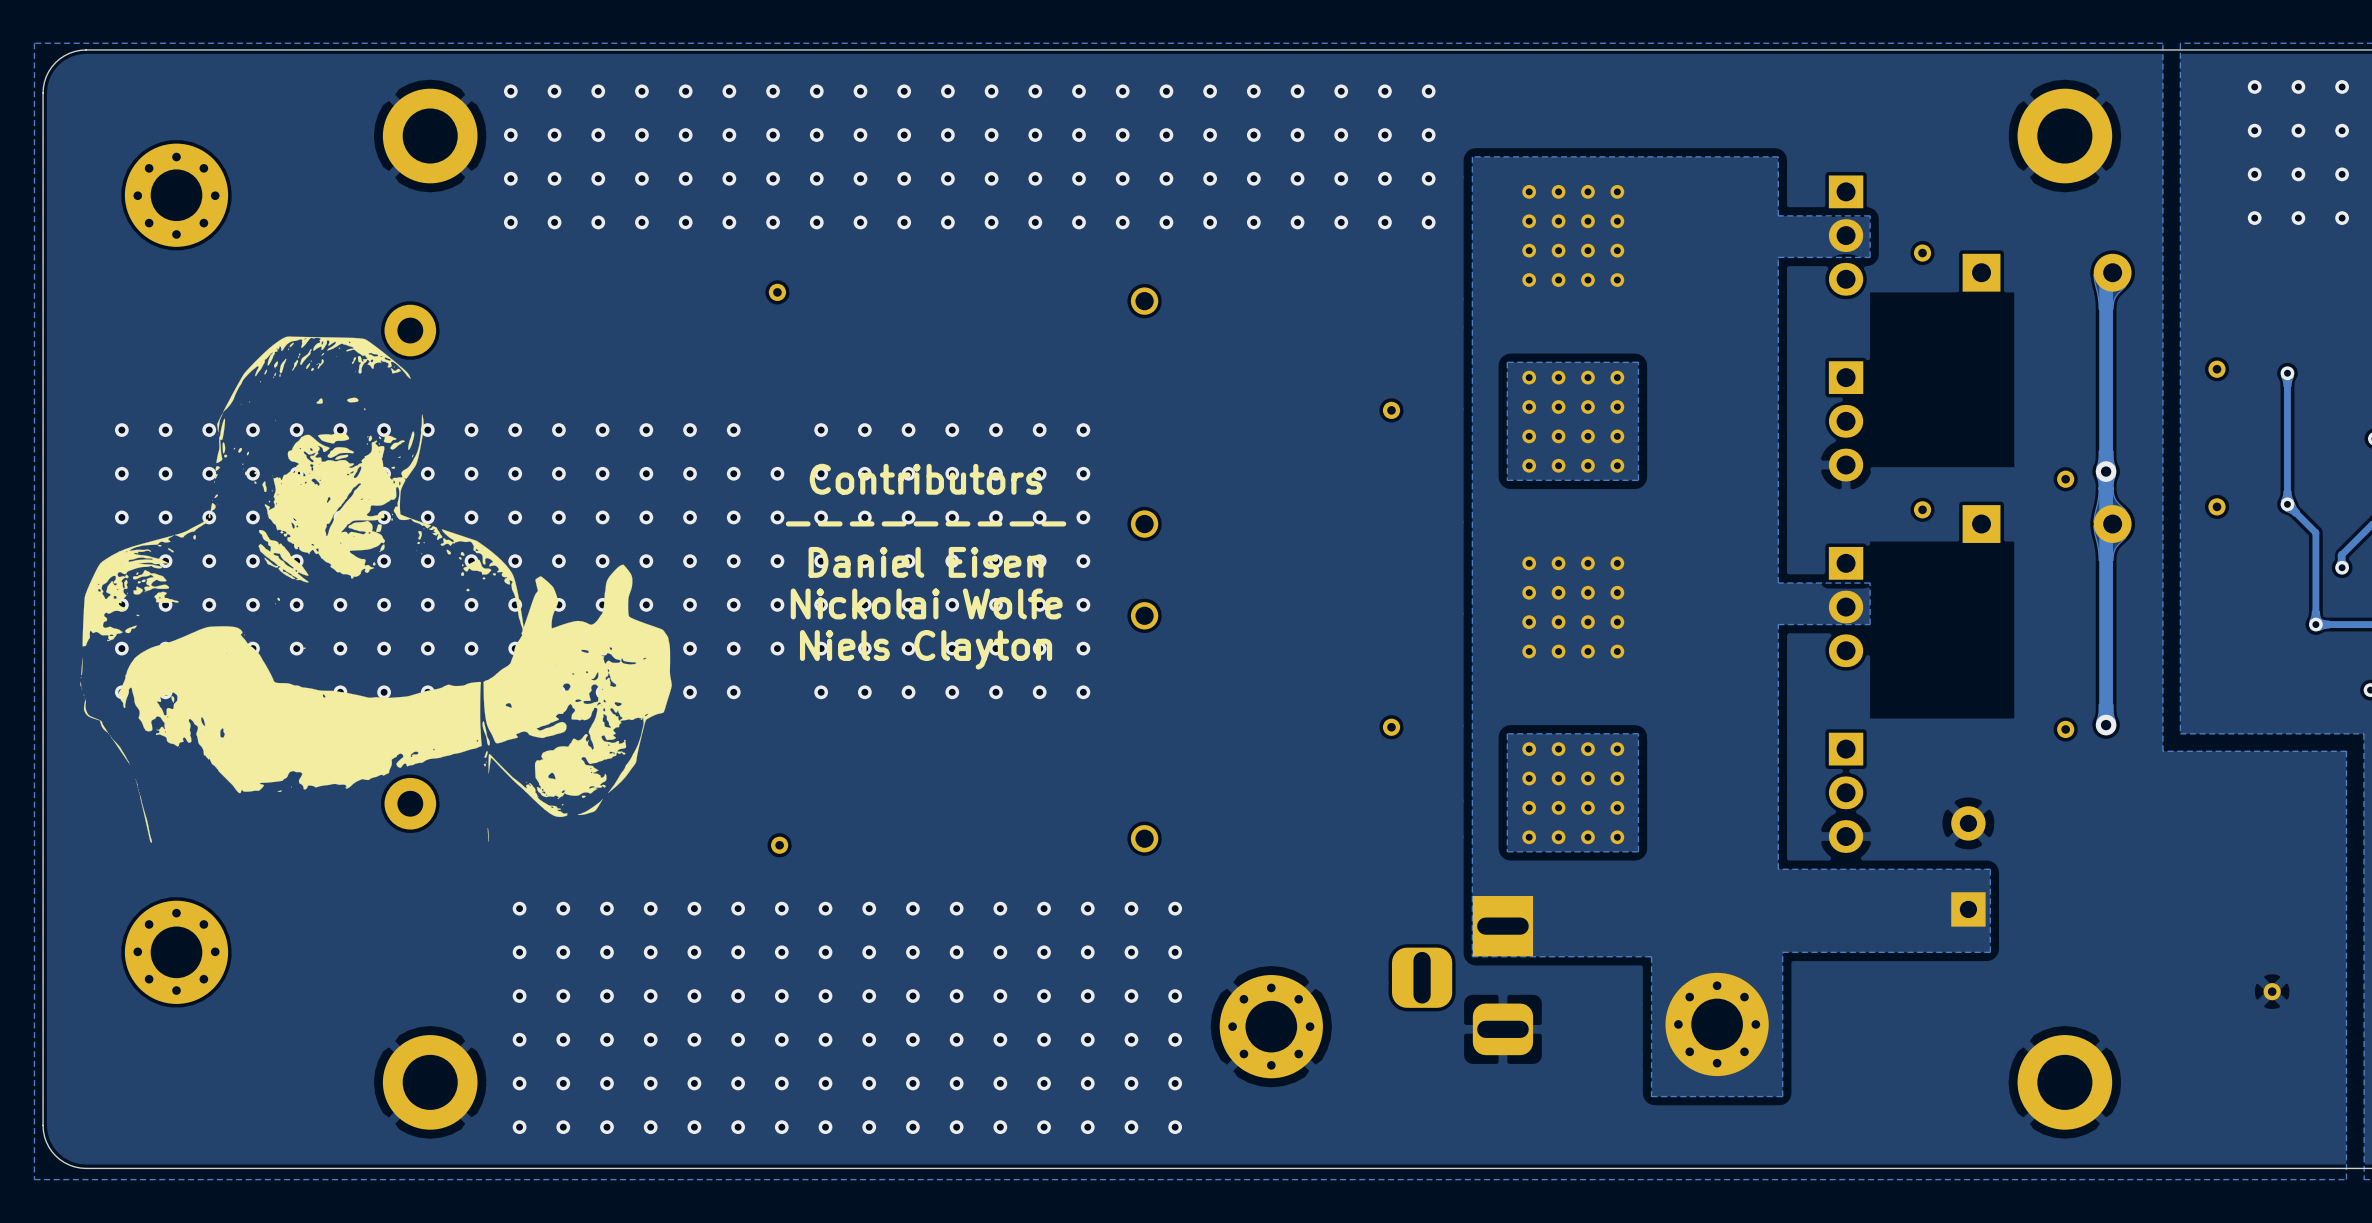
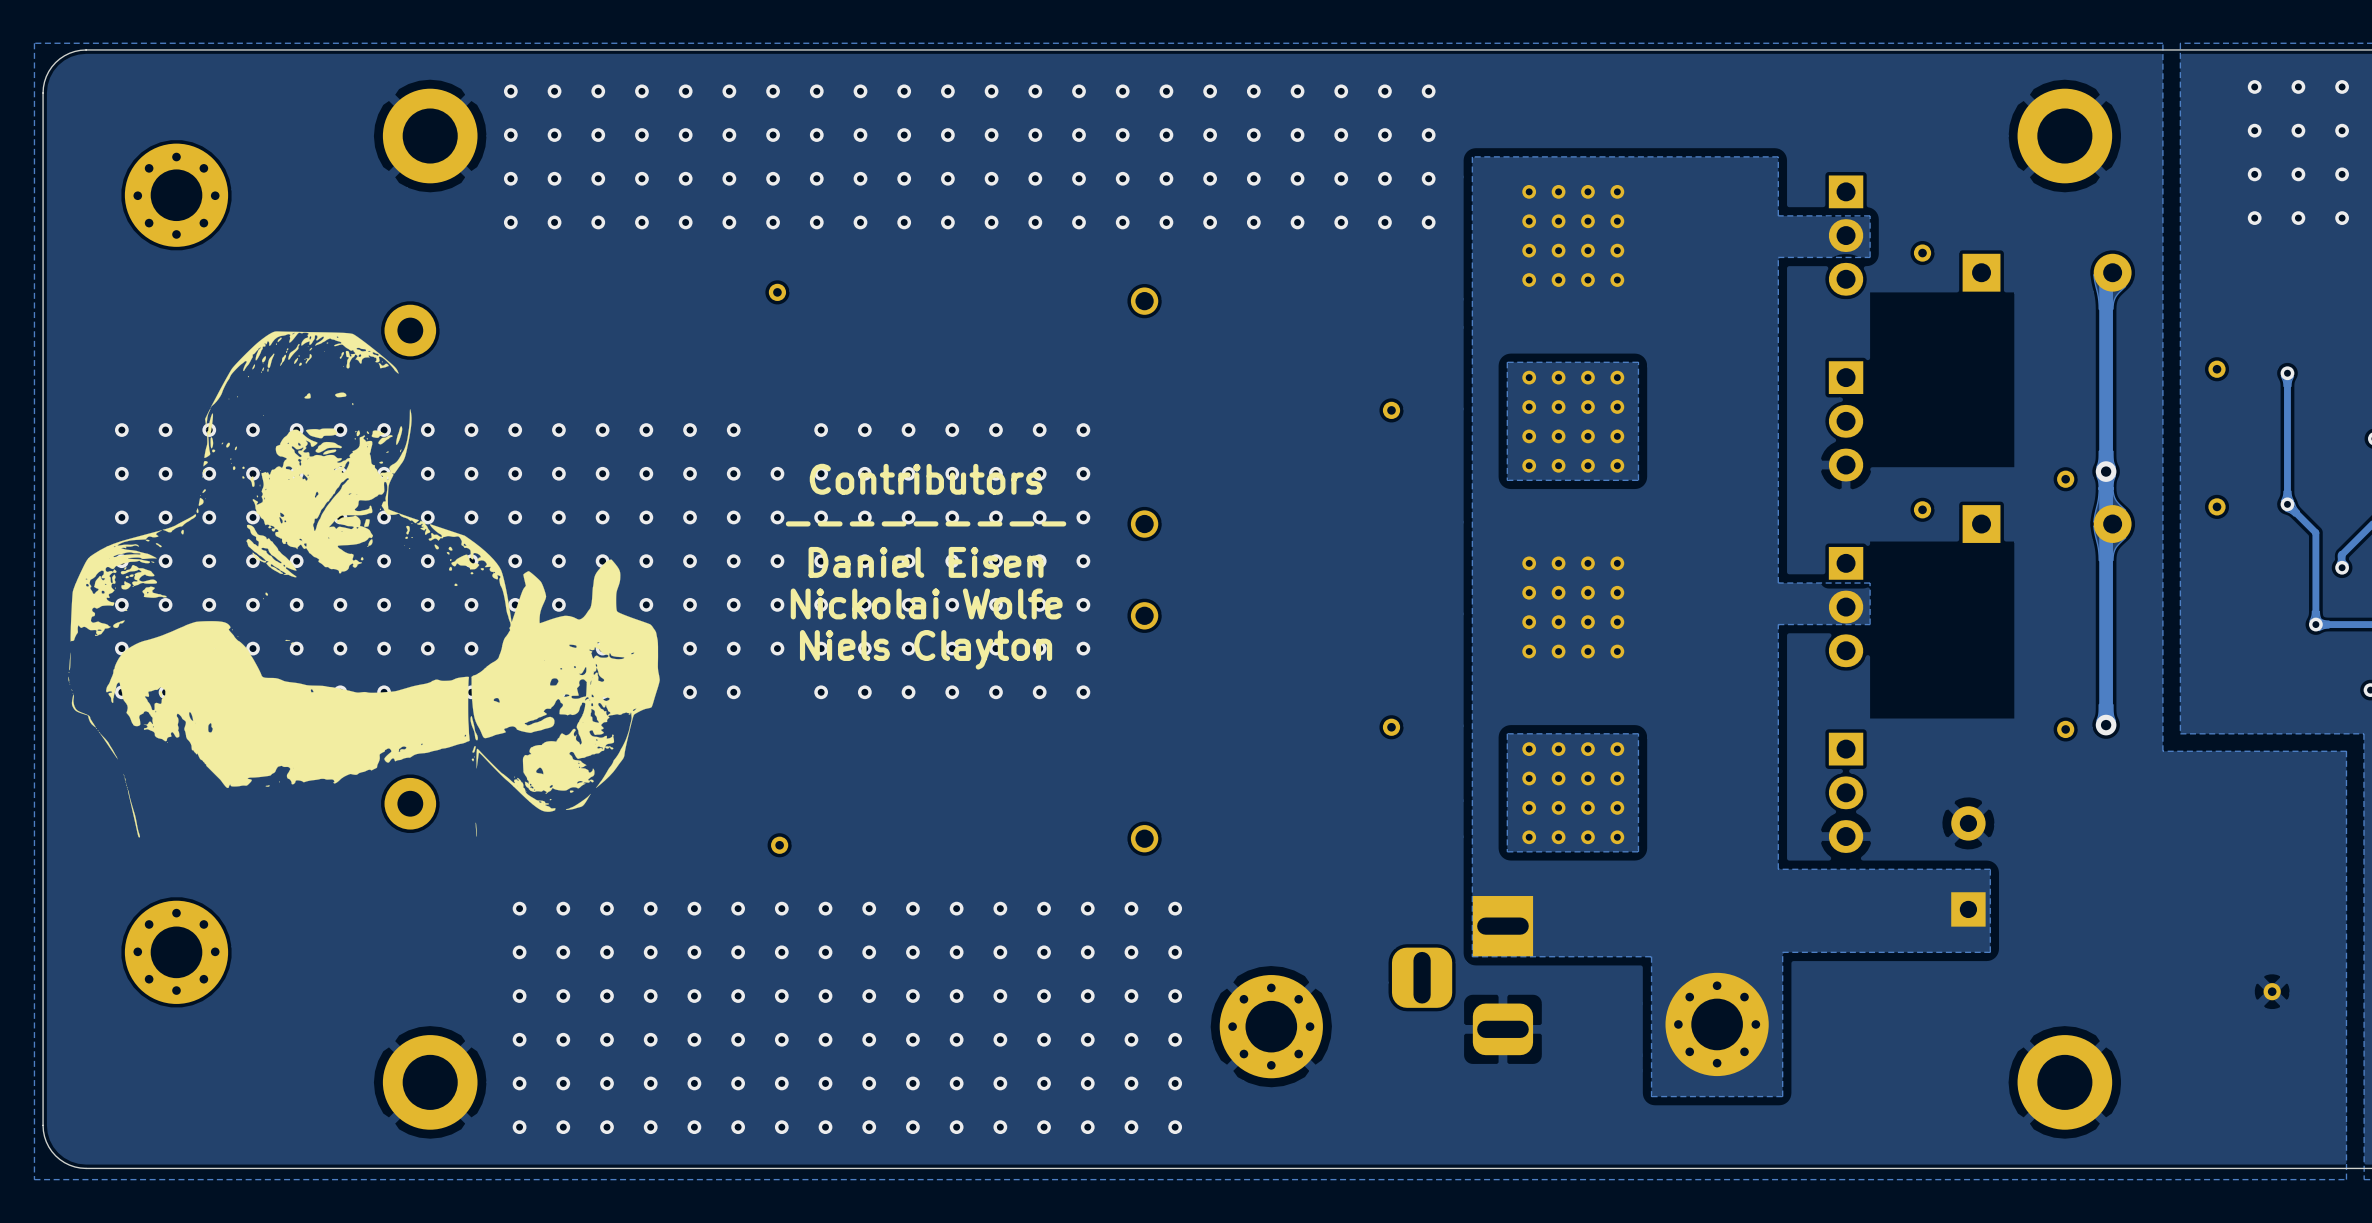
drawing position: (376, 589) -> (364, 584)

